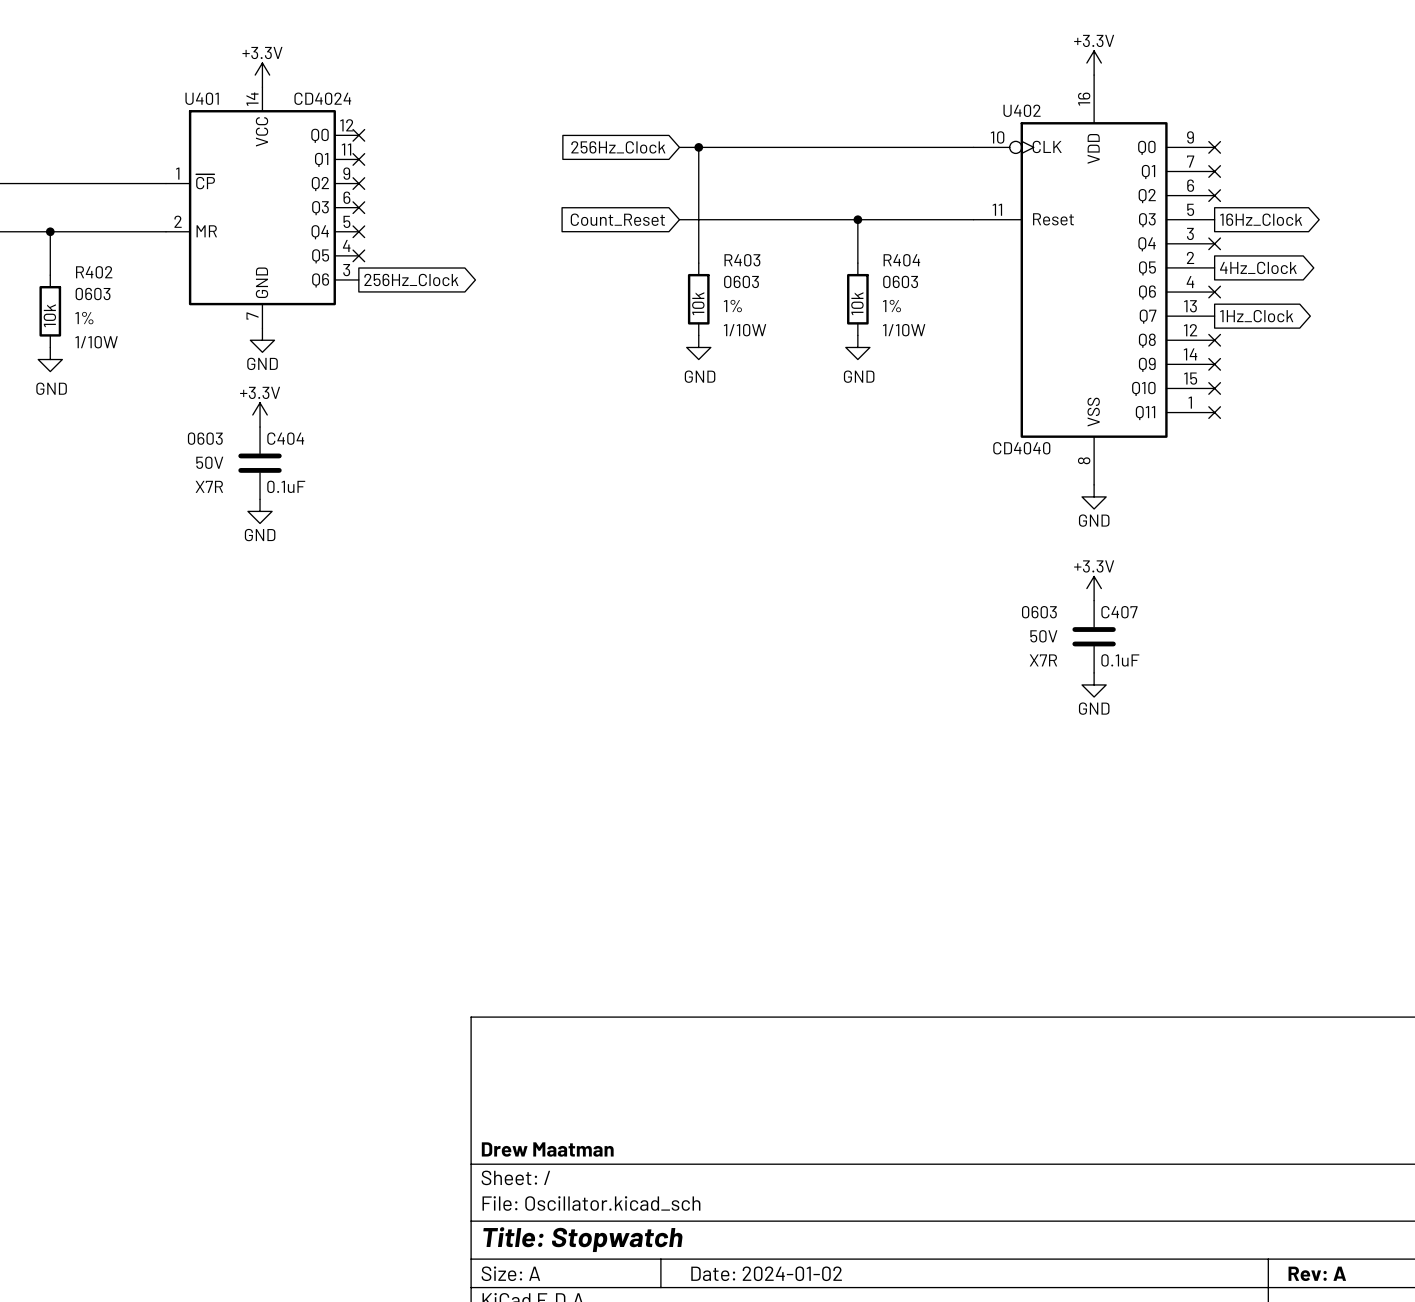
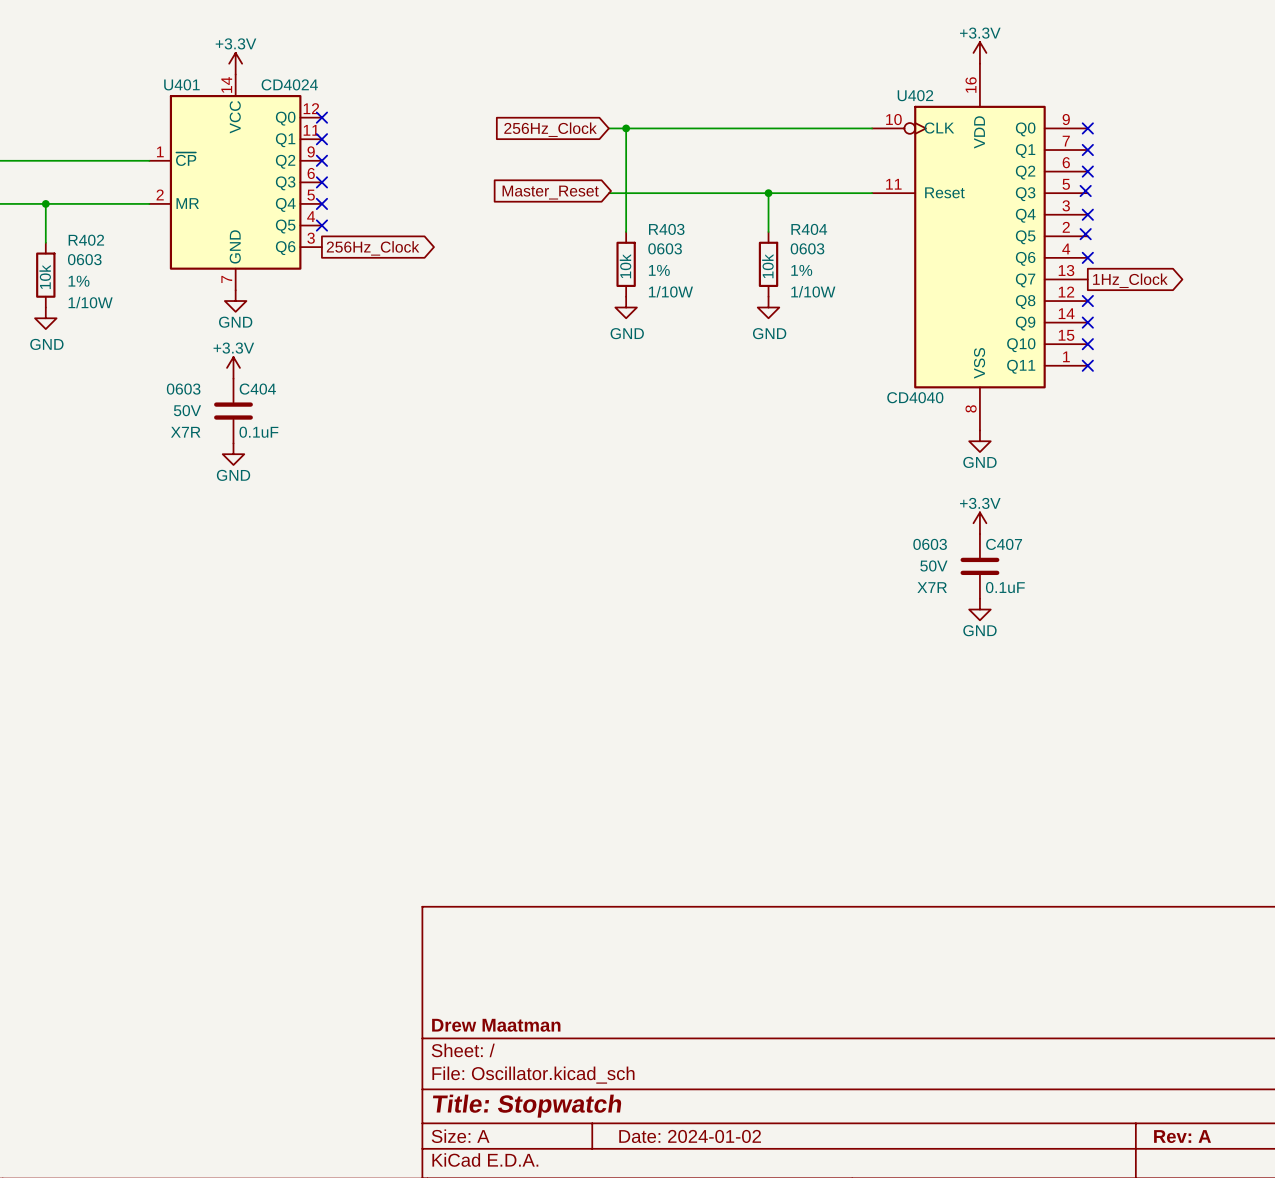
no-connect mark: none -> (1085, 191)
global label: Count_Reset (617, 219) -> Master_Reset (550, 192)
global label: 16Hz_Clock (1261, 219) -> none
no-connect mark: none -> (1085, 234)
global label: 4Hz_Clock (1258, 267) -> none

